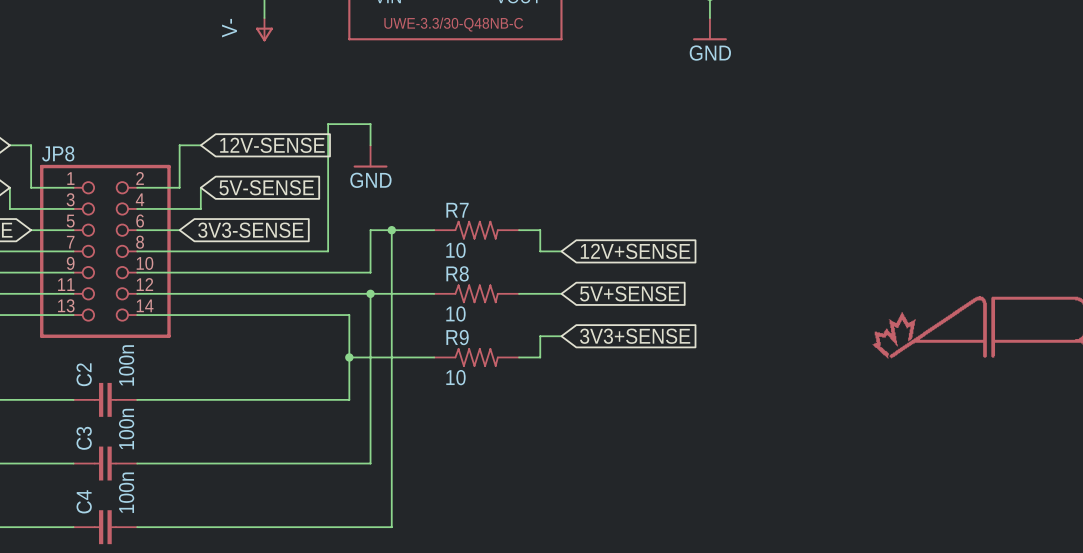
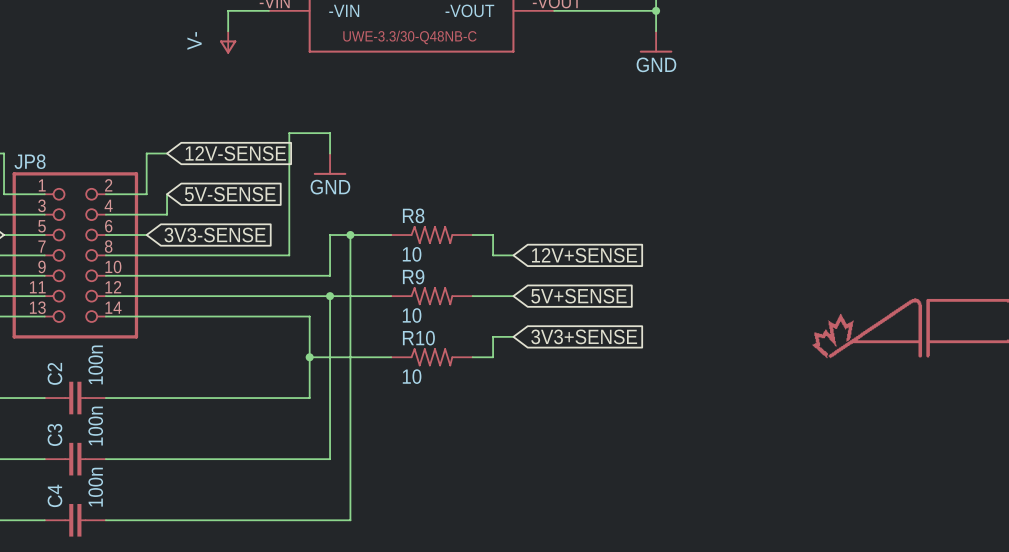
R7 name: R7 (457, 210) -> R8 (413, 215)
R8 name: R8 (457, 273) -> R9 (413, 276)
R9 name: R9 (457, 337) -> R10 (418, 338)

